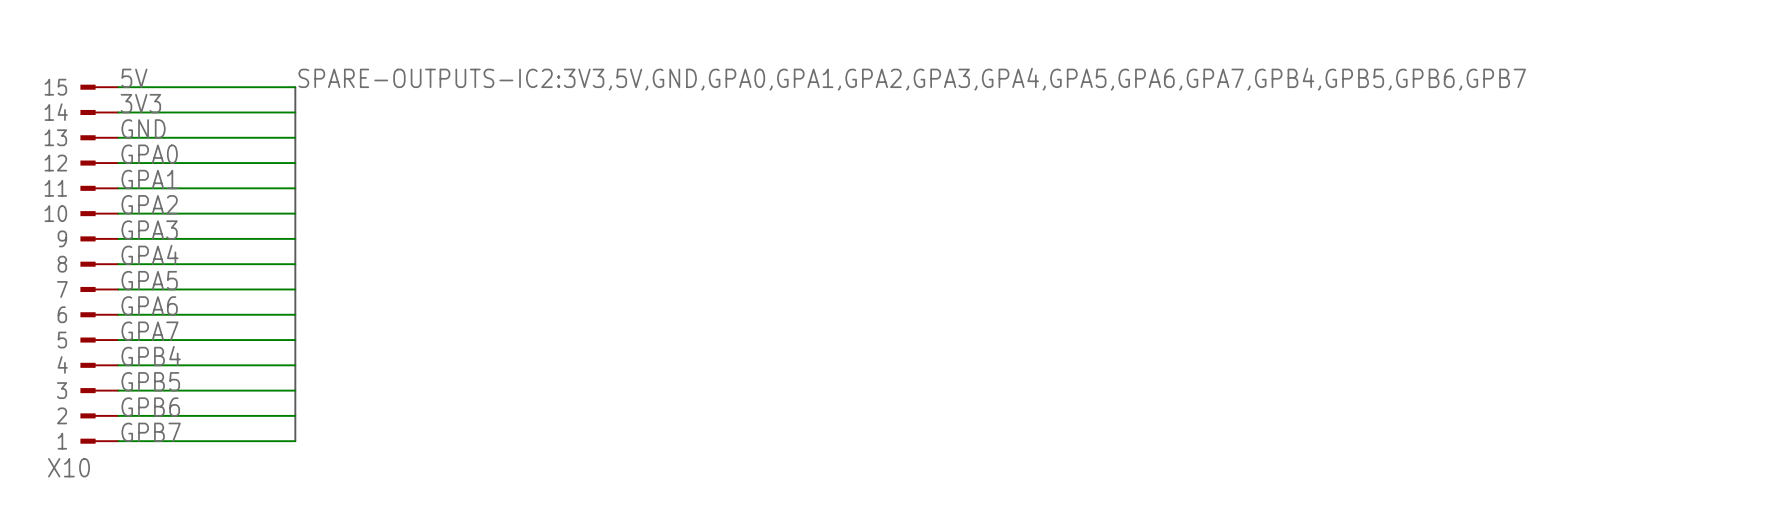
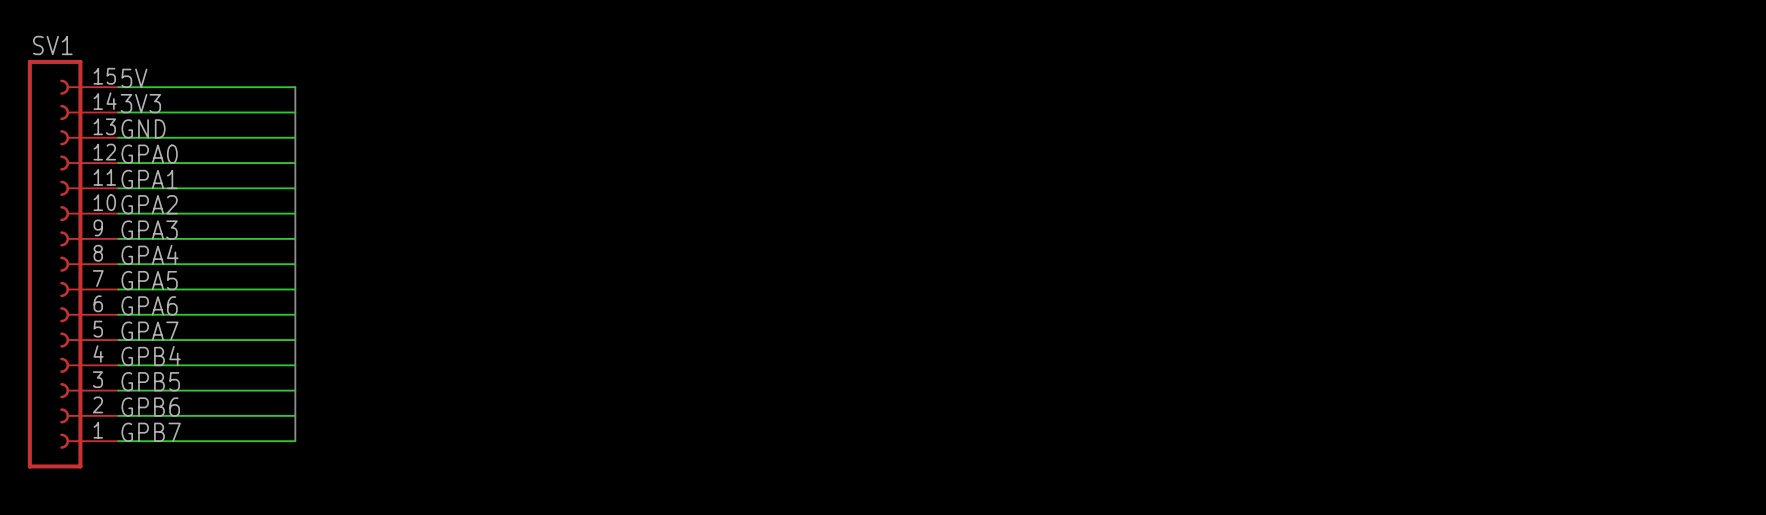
label: SPARE-OUTPUTS-IC2:3V3,5V,GND,GPA0,GPA1,GPA2,GPA3,GPA4,GPA5,GPA6,GPA7,GPB4,GPB5,GPB6,GPB7 (912, 79) -> none
SV1: none -> (73, 264)
X10: (99, 264) -> none

